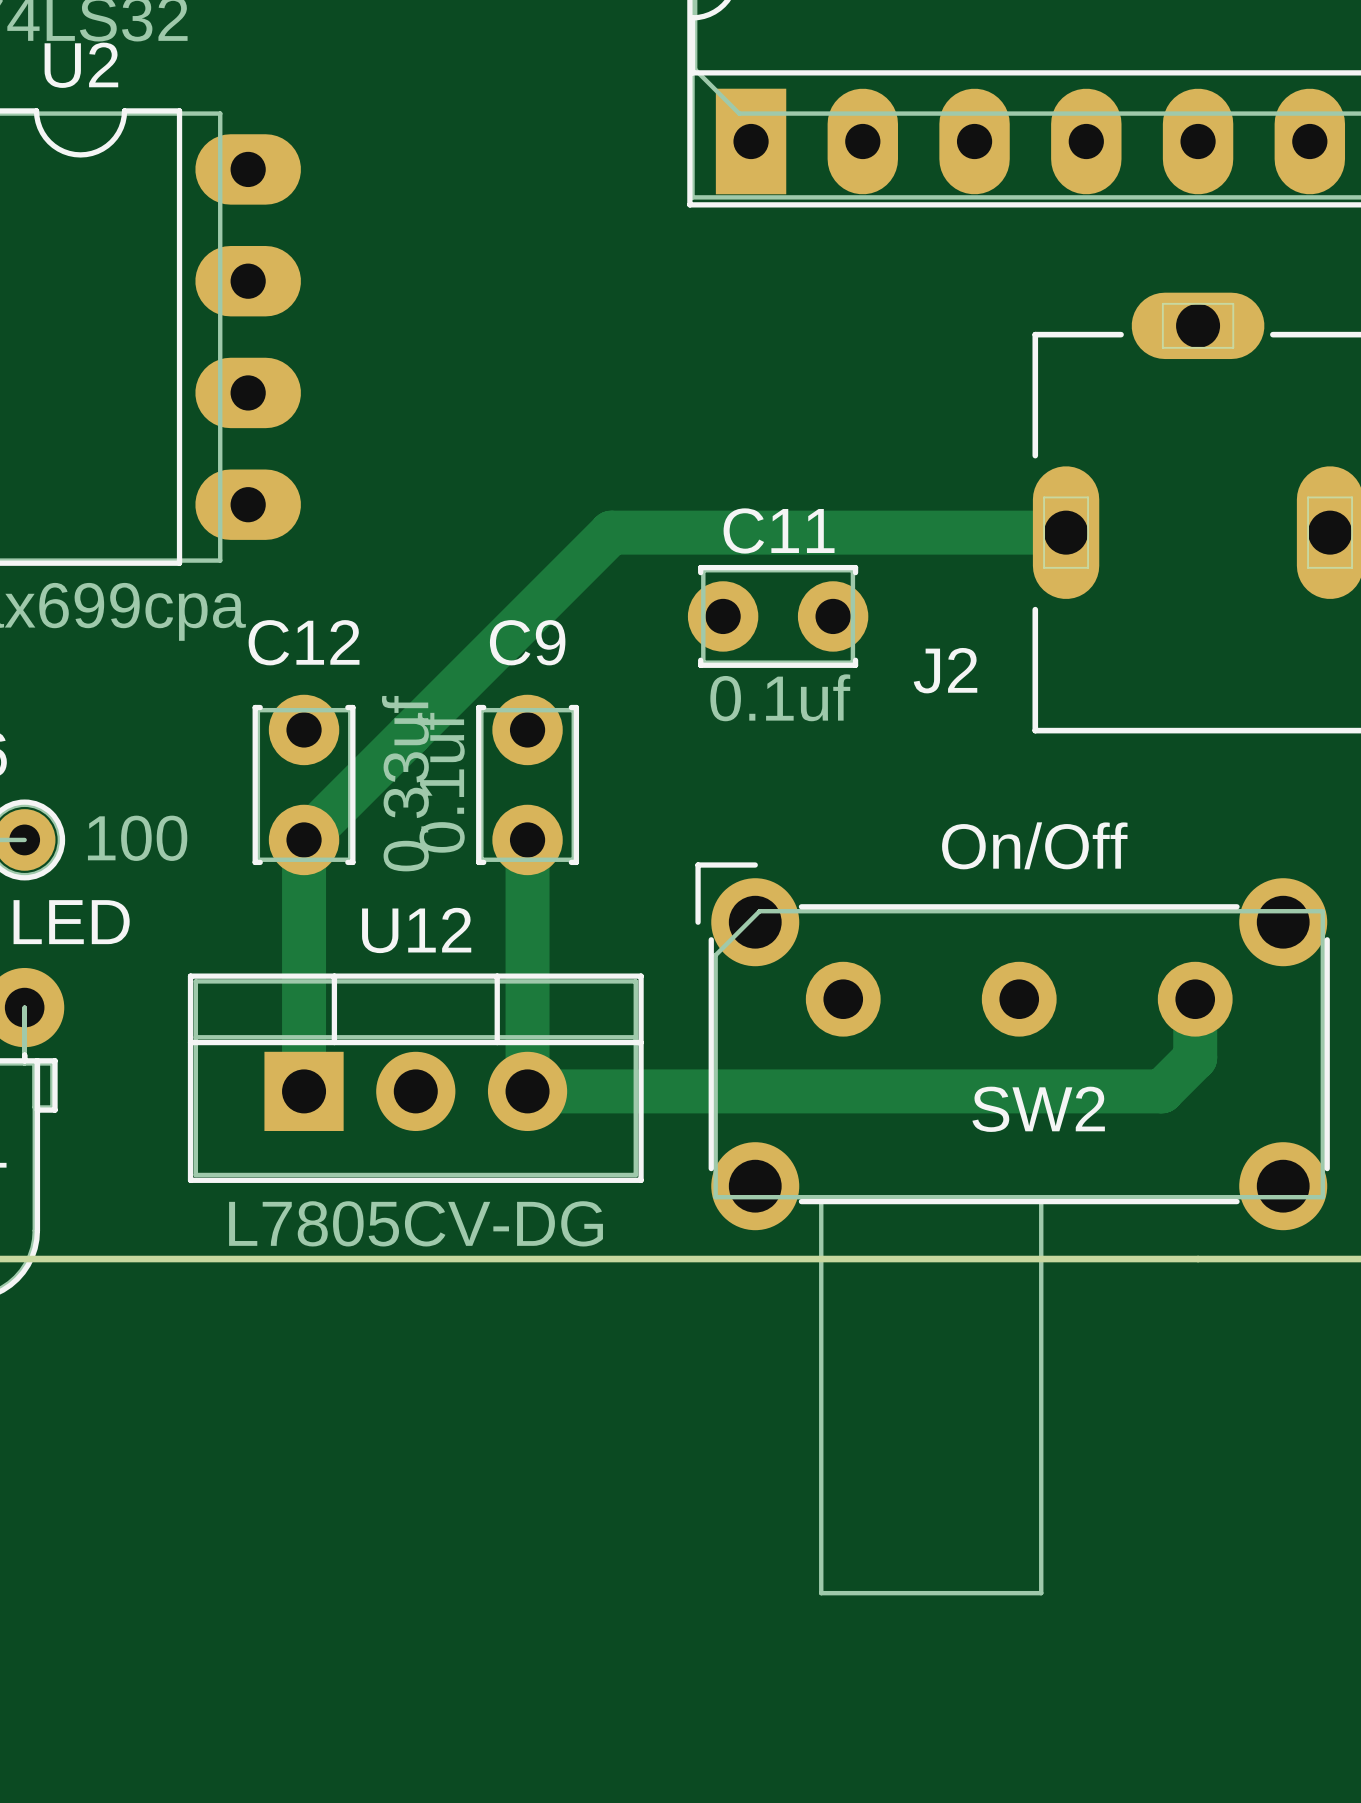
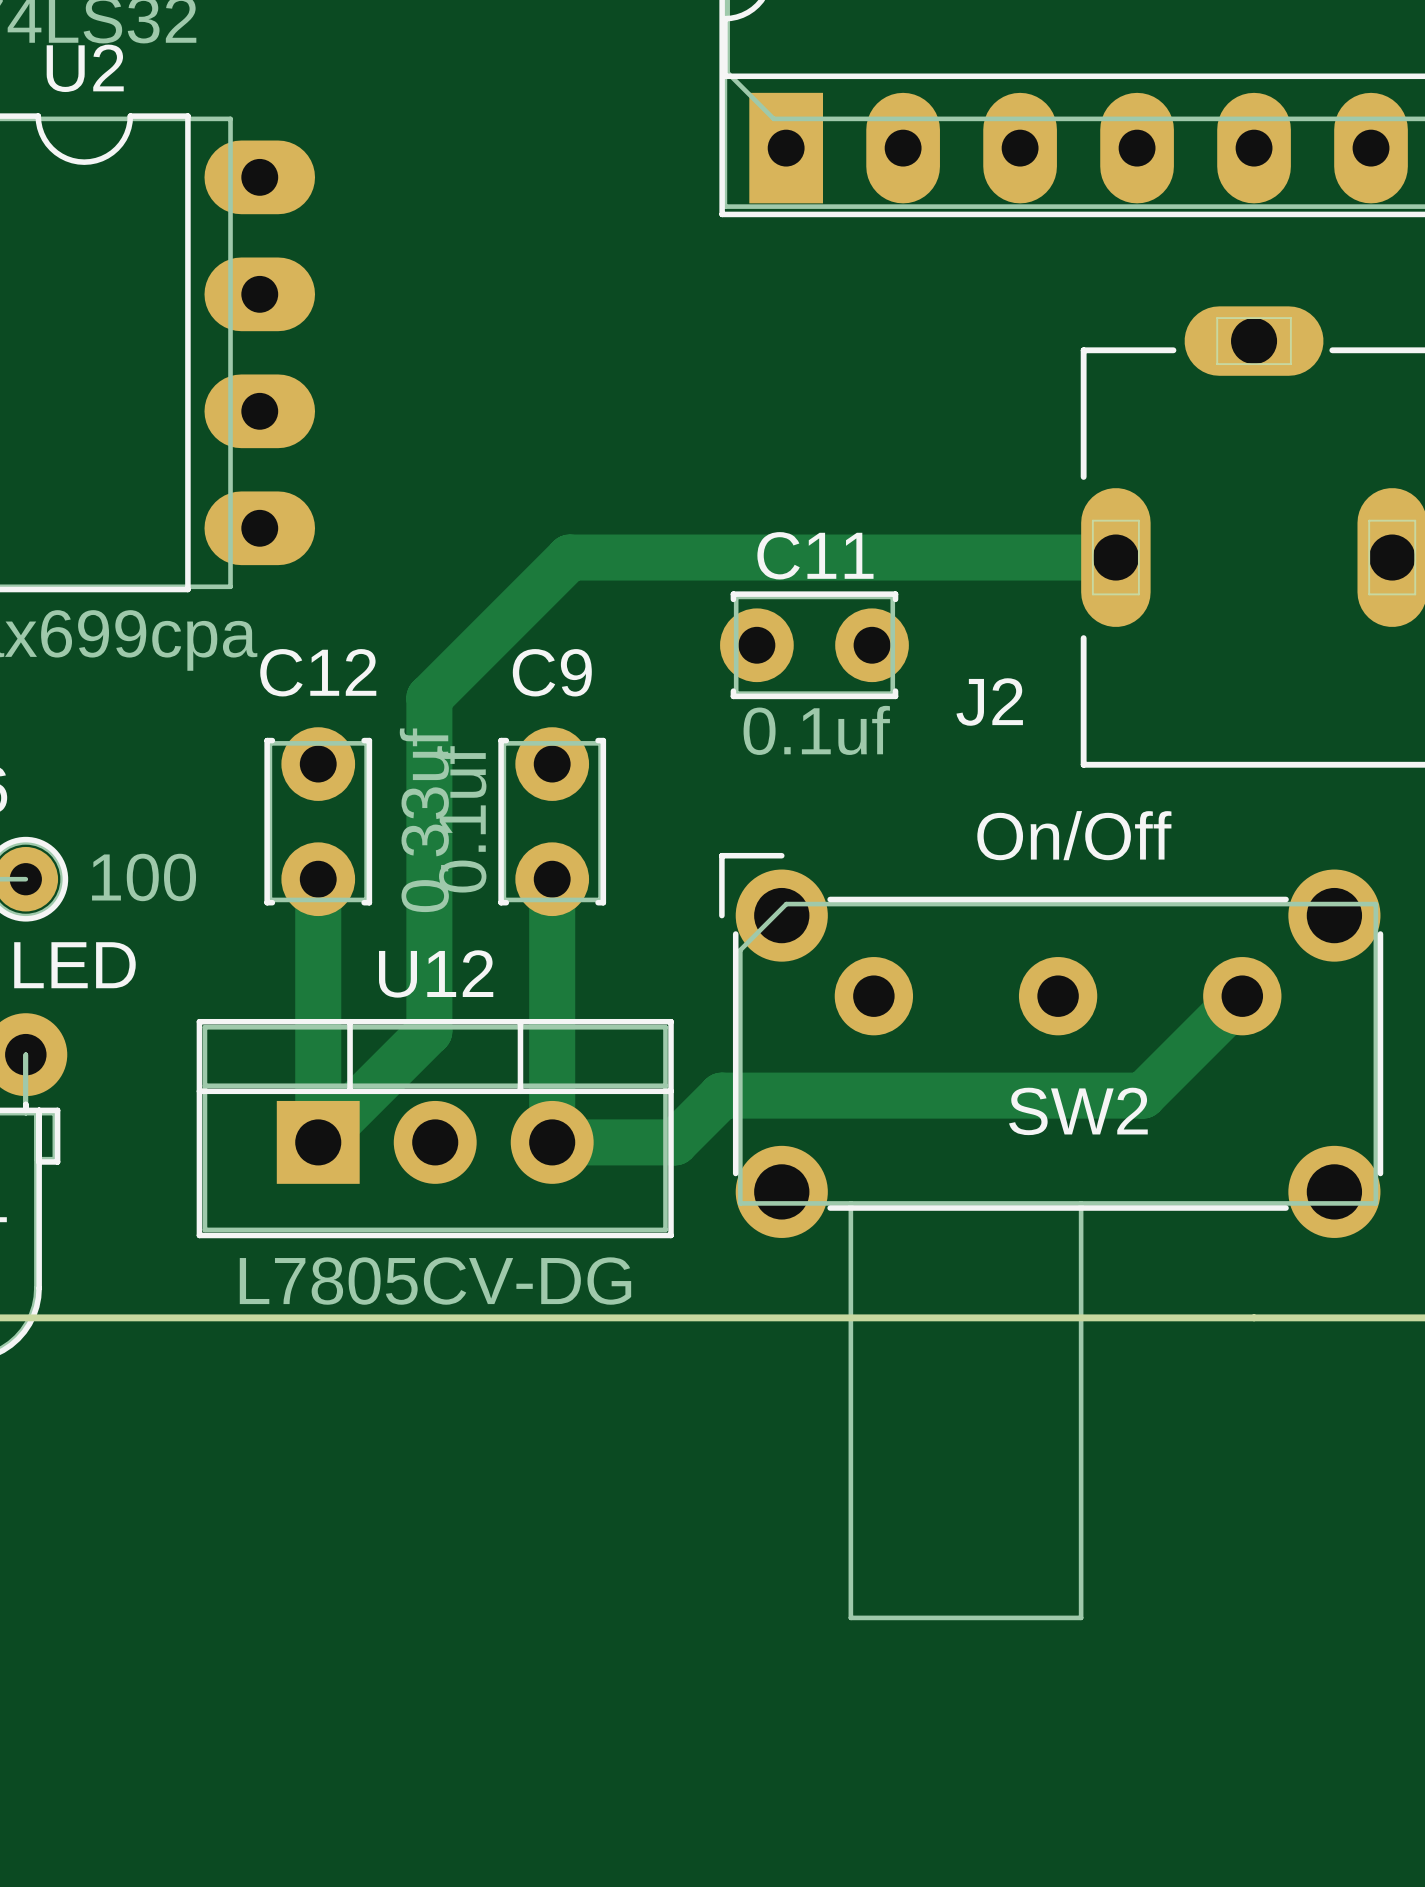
track: (611, 532) (304, 839) -> (639, 557) (569, 557) (429, 697) (429, 1031) (318, 1142)
track: (1195, 999) (1195, 1057) (1161, 1091) (644, 1091) -> (1242, 996) (1142, 1095) (721, 1095) (675, 1142)
SW2 position: (1012, 1228) -> (1051, 1236)

